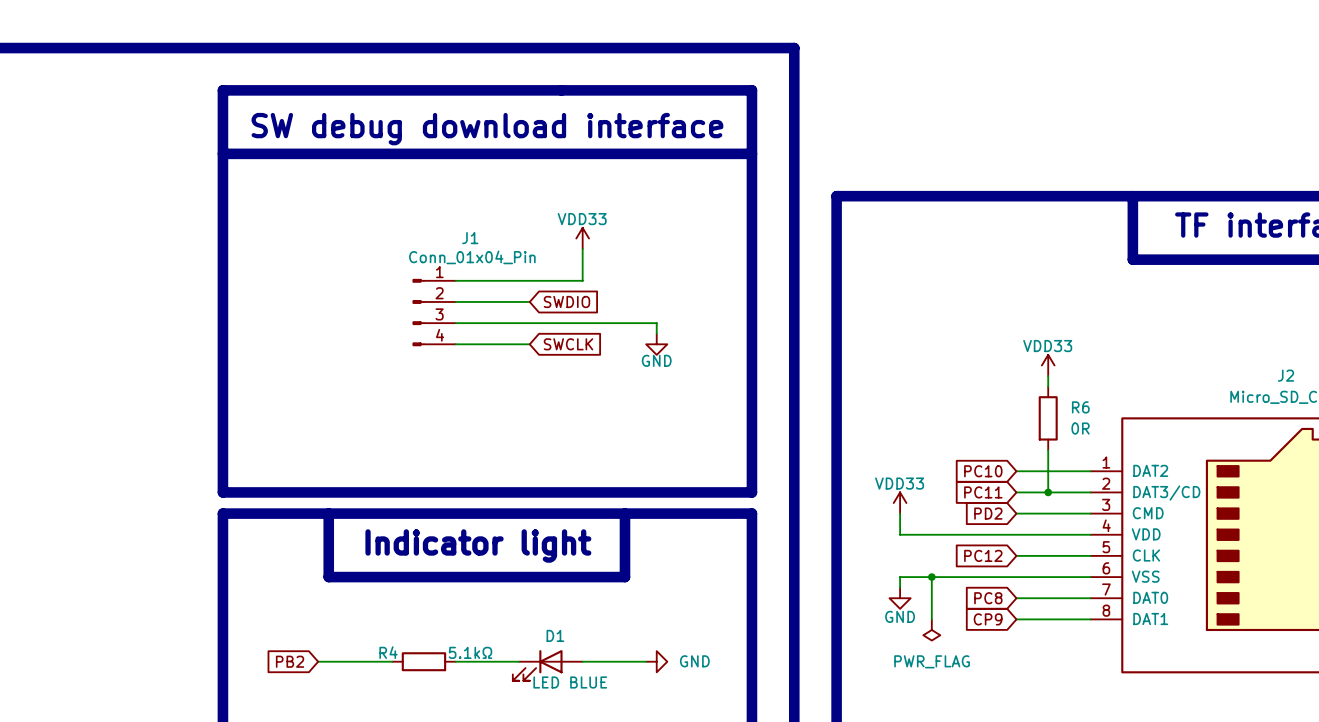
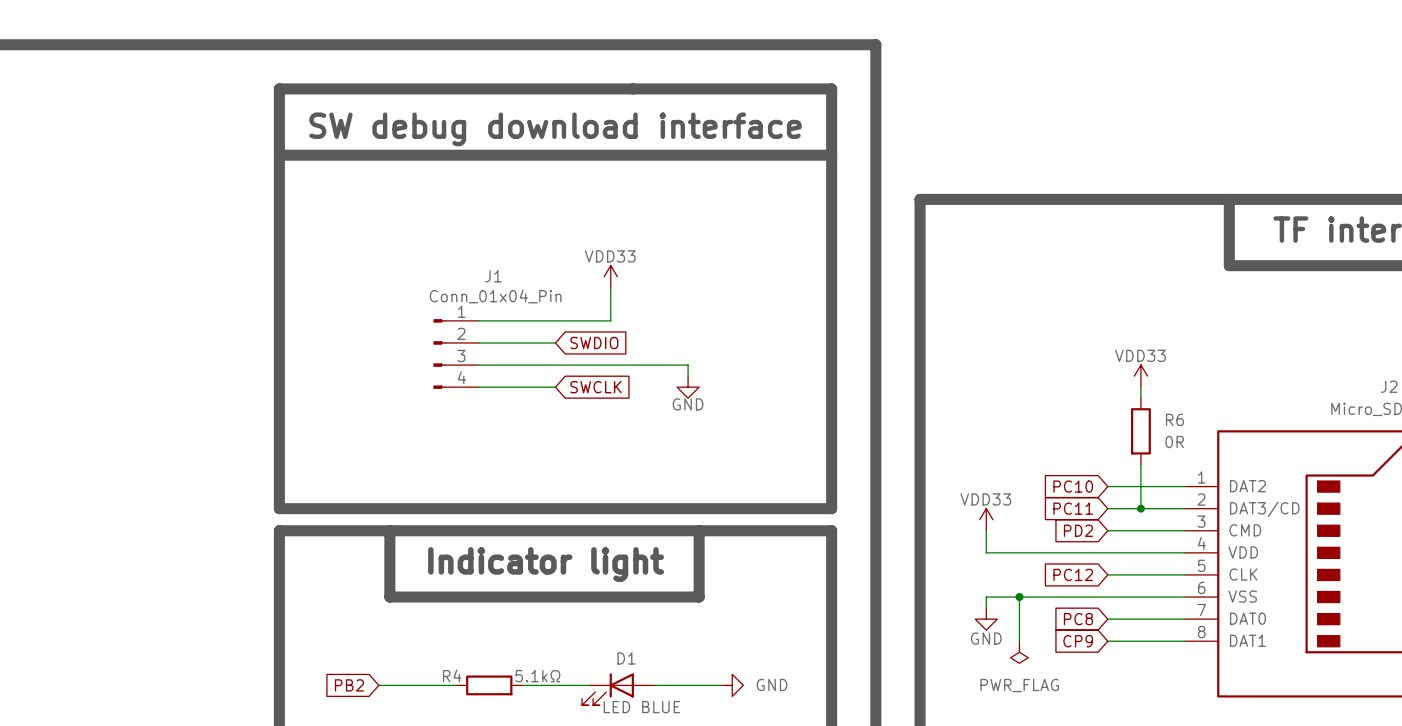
power symbol position: VDD33 (582, 238) -> VDD33 (610, 276)
wire: (582, 249) (582, 280) (455, 280) -> (610, 287) (610, 320) (478, 320)
wire: (455, 301) (529, 301) -> (478, 387) (555, 387)
global label position: SWDIO (566, 301) -> SWDIO (594, 342)
J1 position: (434, 312) -> (455, 354)
wire: (455, 323) (656, 323) (656, 333) -> (478, 365) (688, 365) (688, 376)
wire: (455, 344) (529, 344) -> (478, 342) (555, 342)
global label position: SWCLK (568, 344) -> SWCLK (595, 387)
power symbol position: GND (656, 344) -> GND (688, 387)

